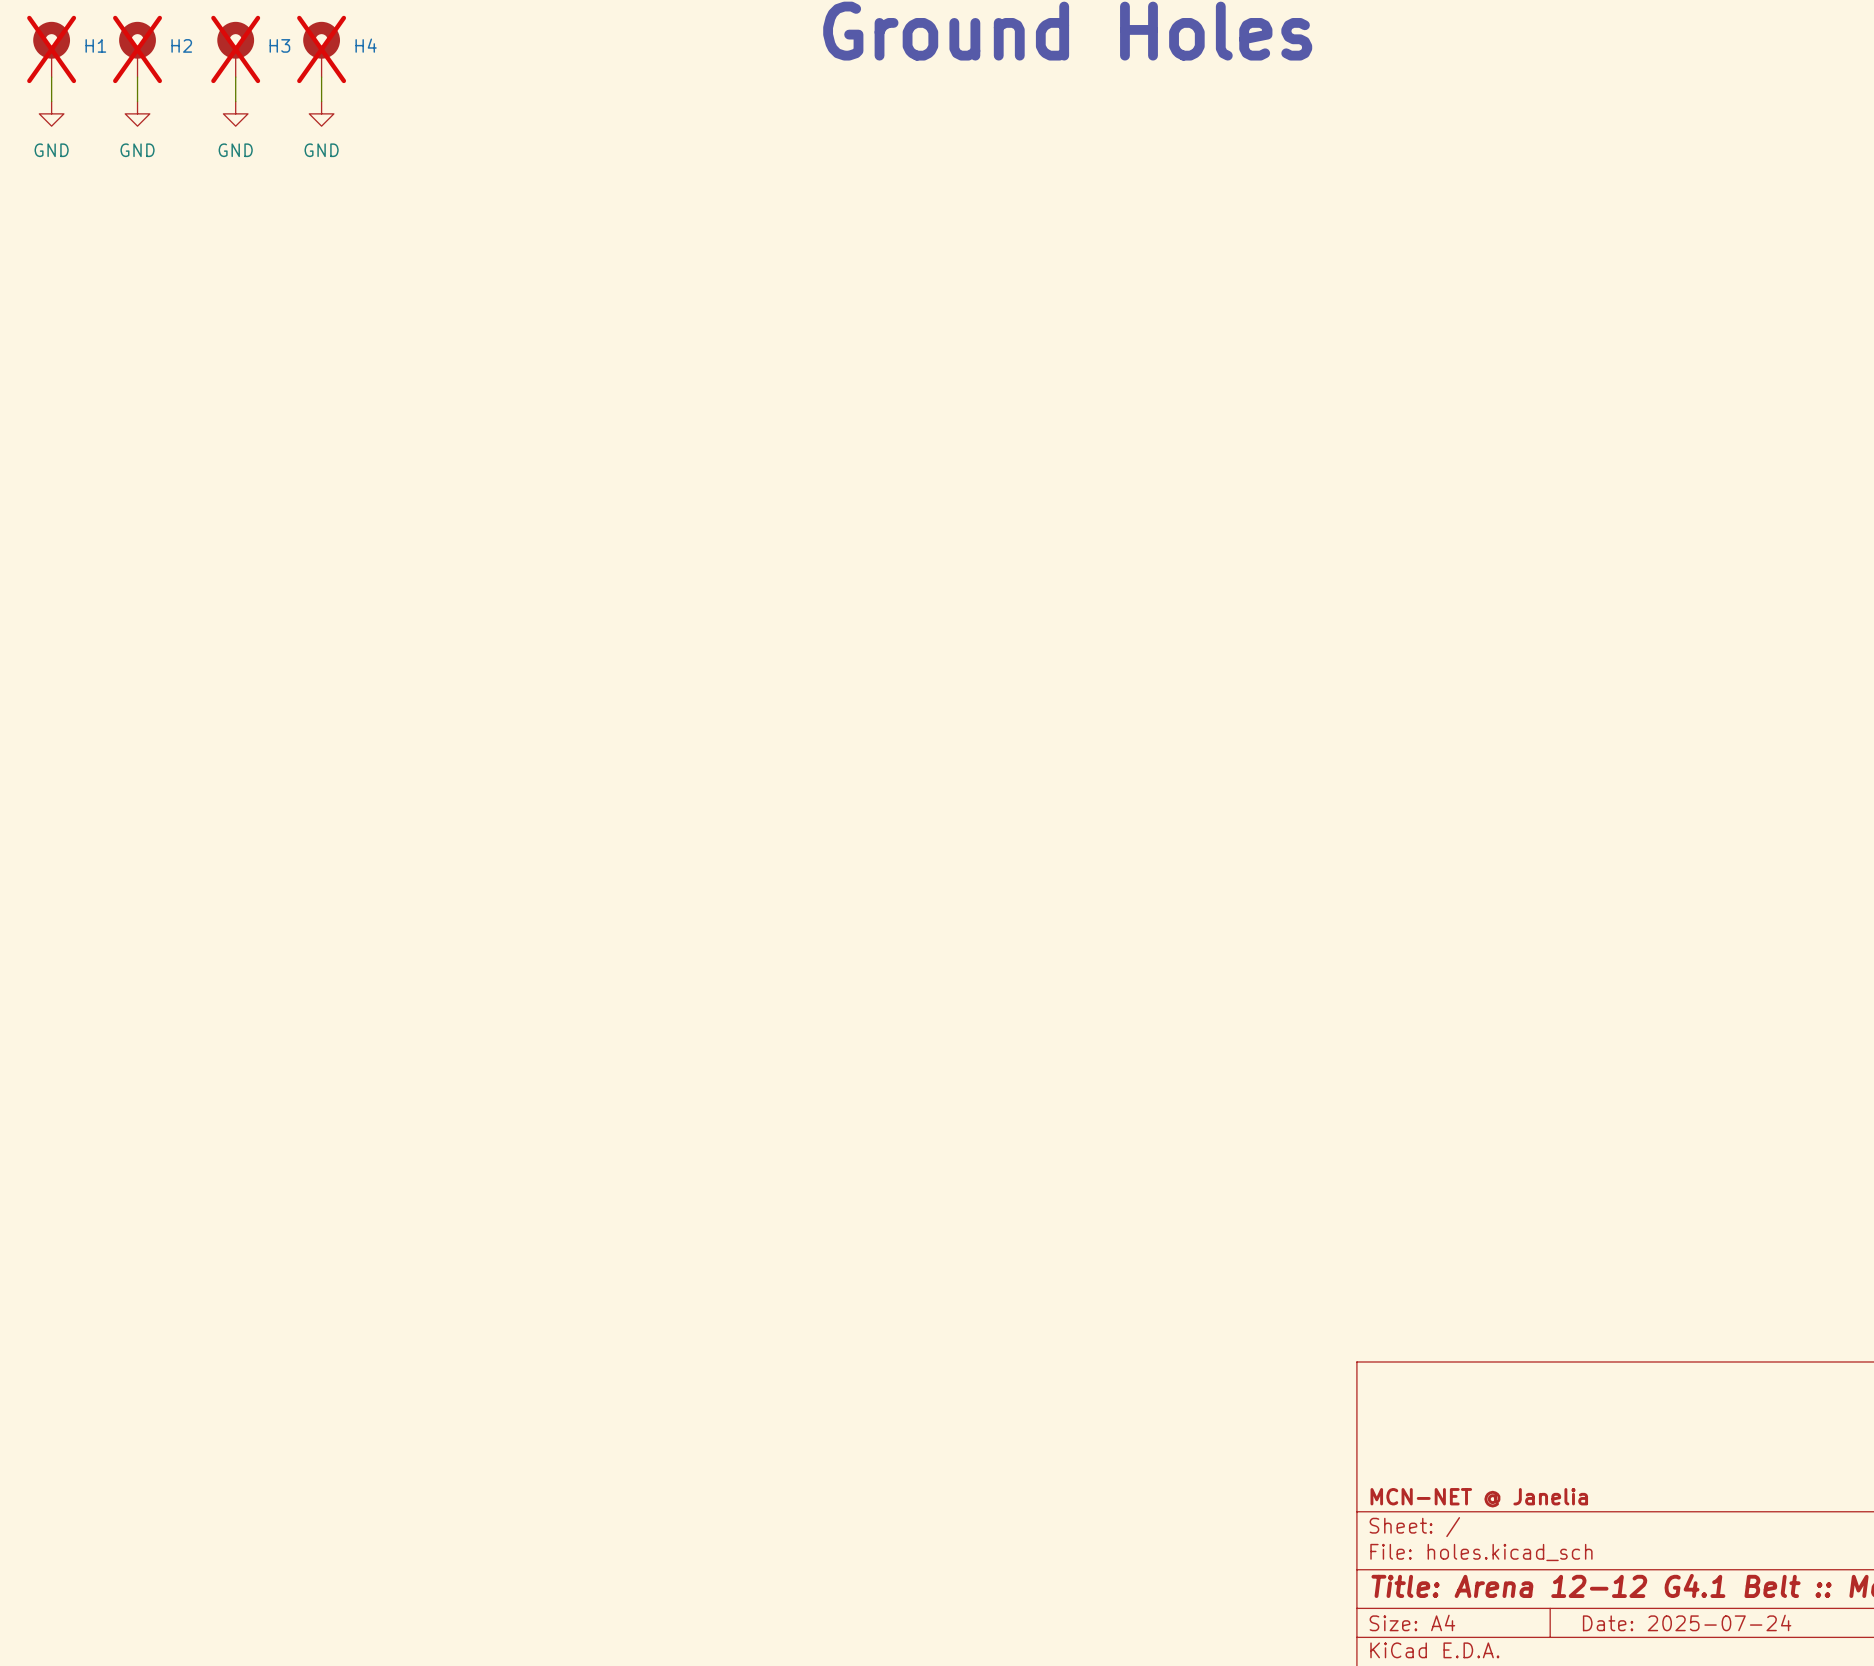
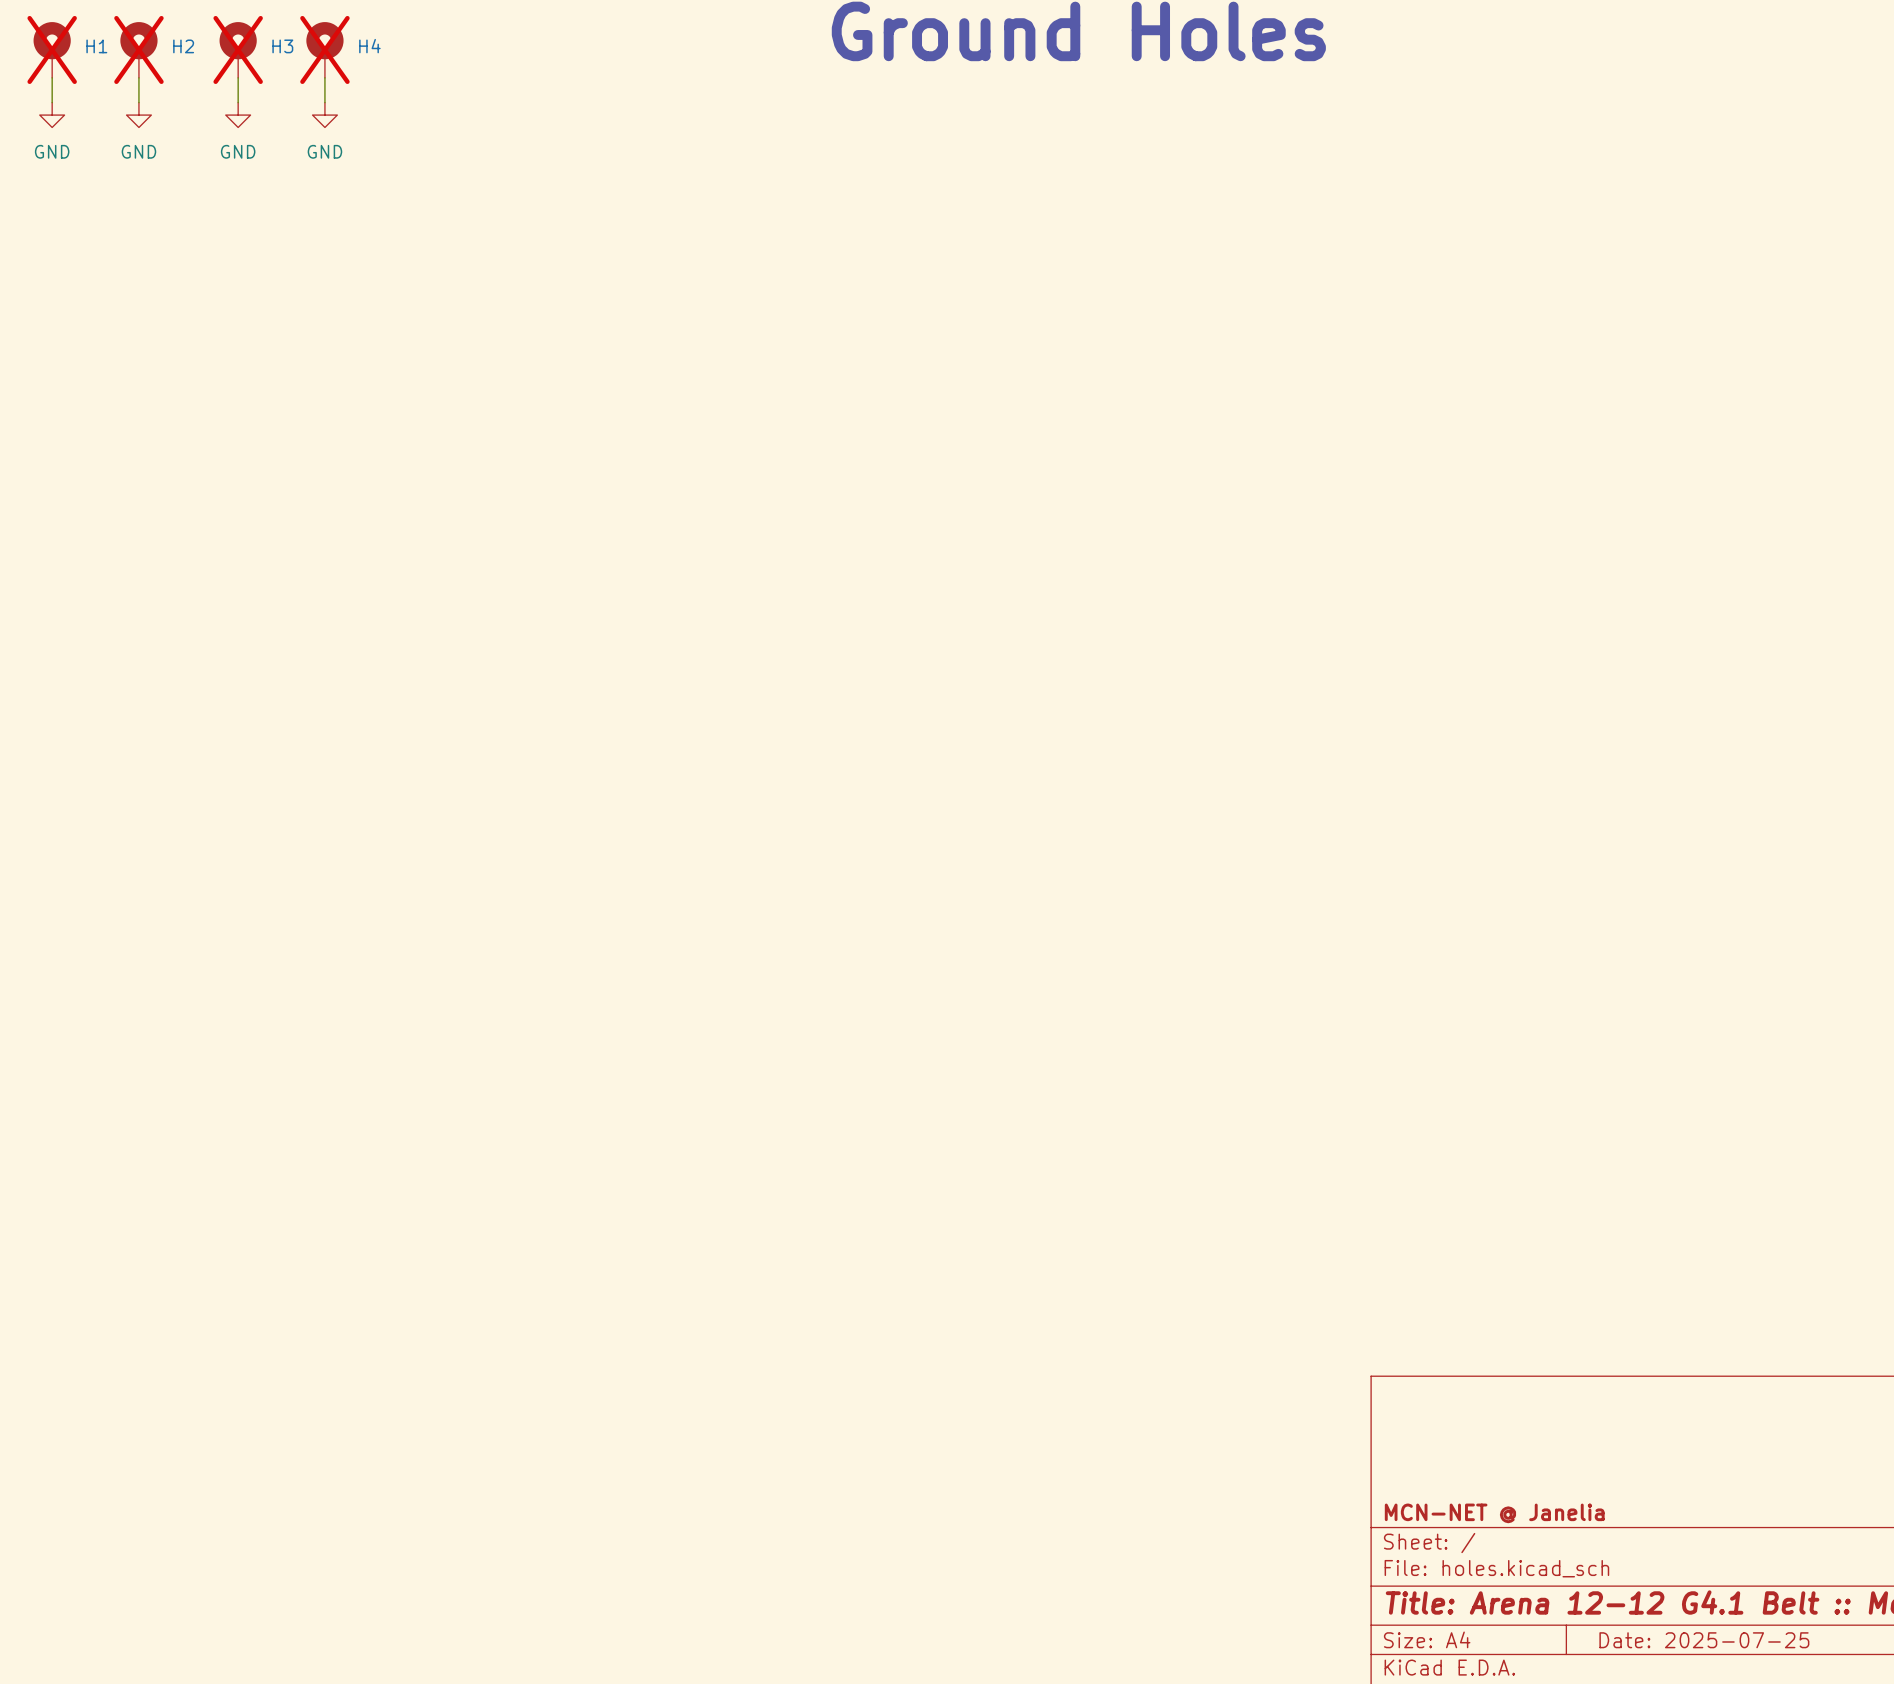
title block: Date: 2025-07-24 (1687, 1622) -> Date: 2025-07-25 (1704, 1640)

